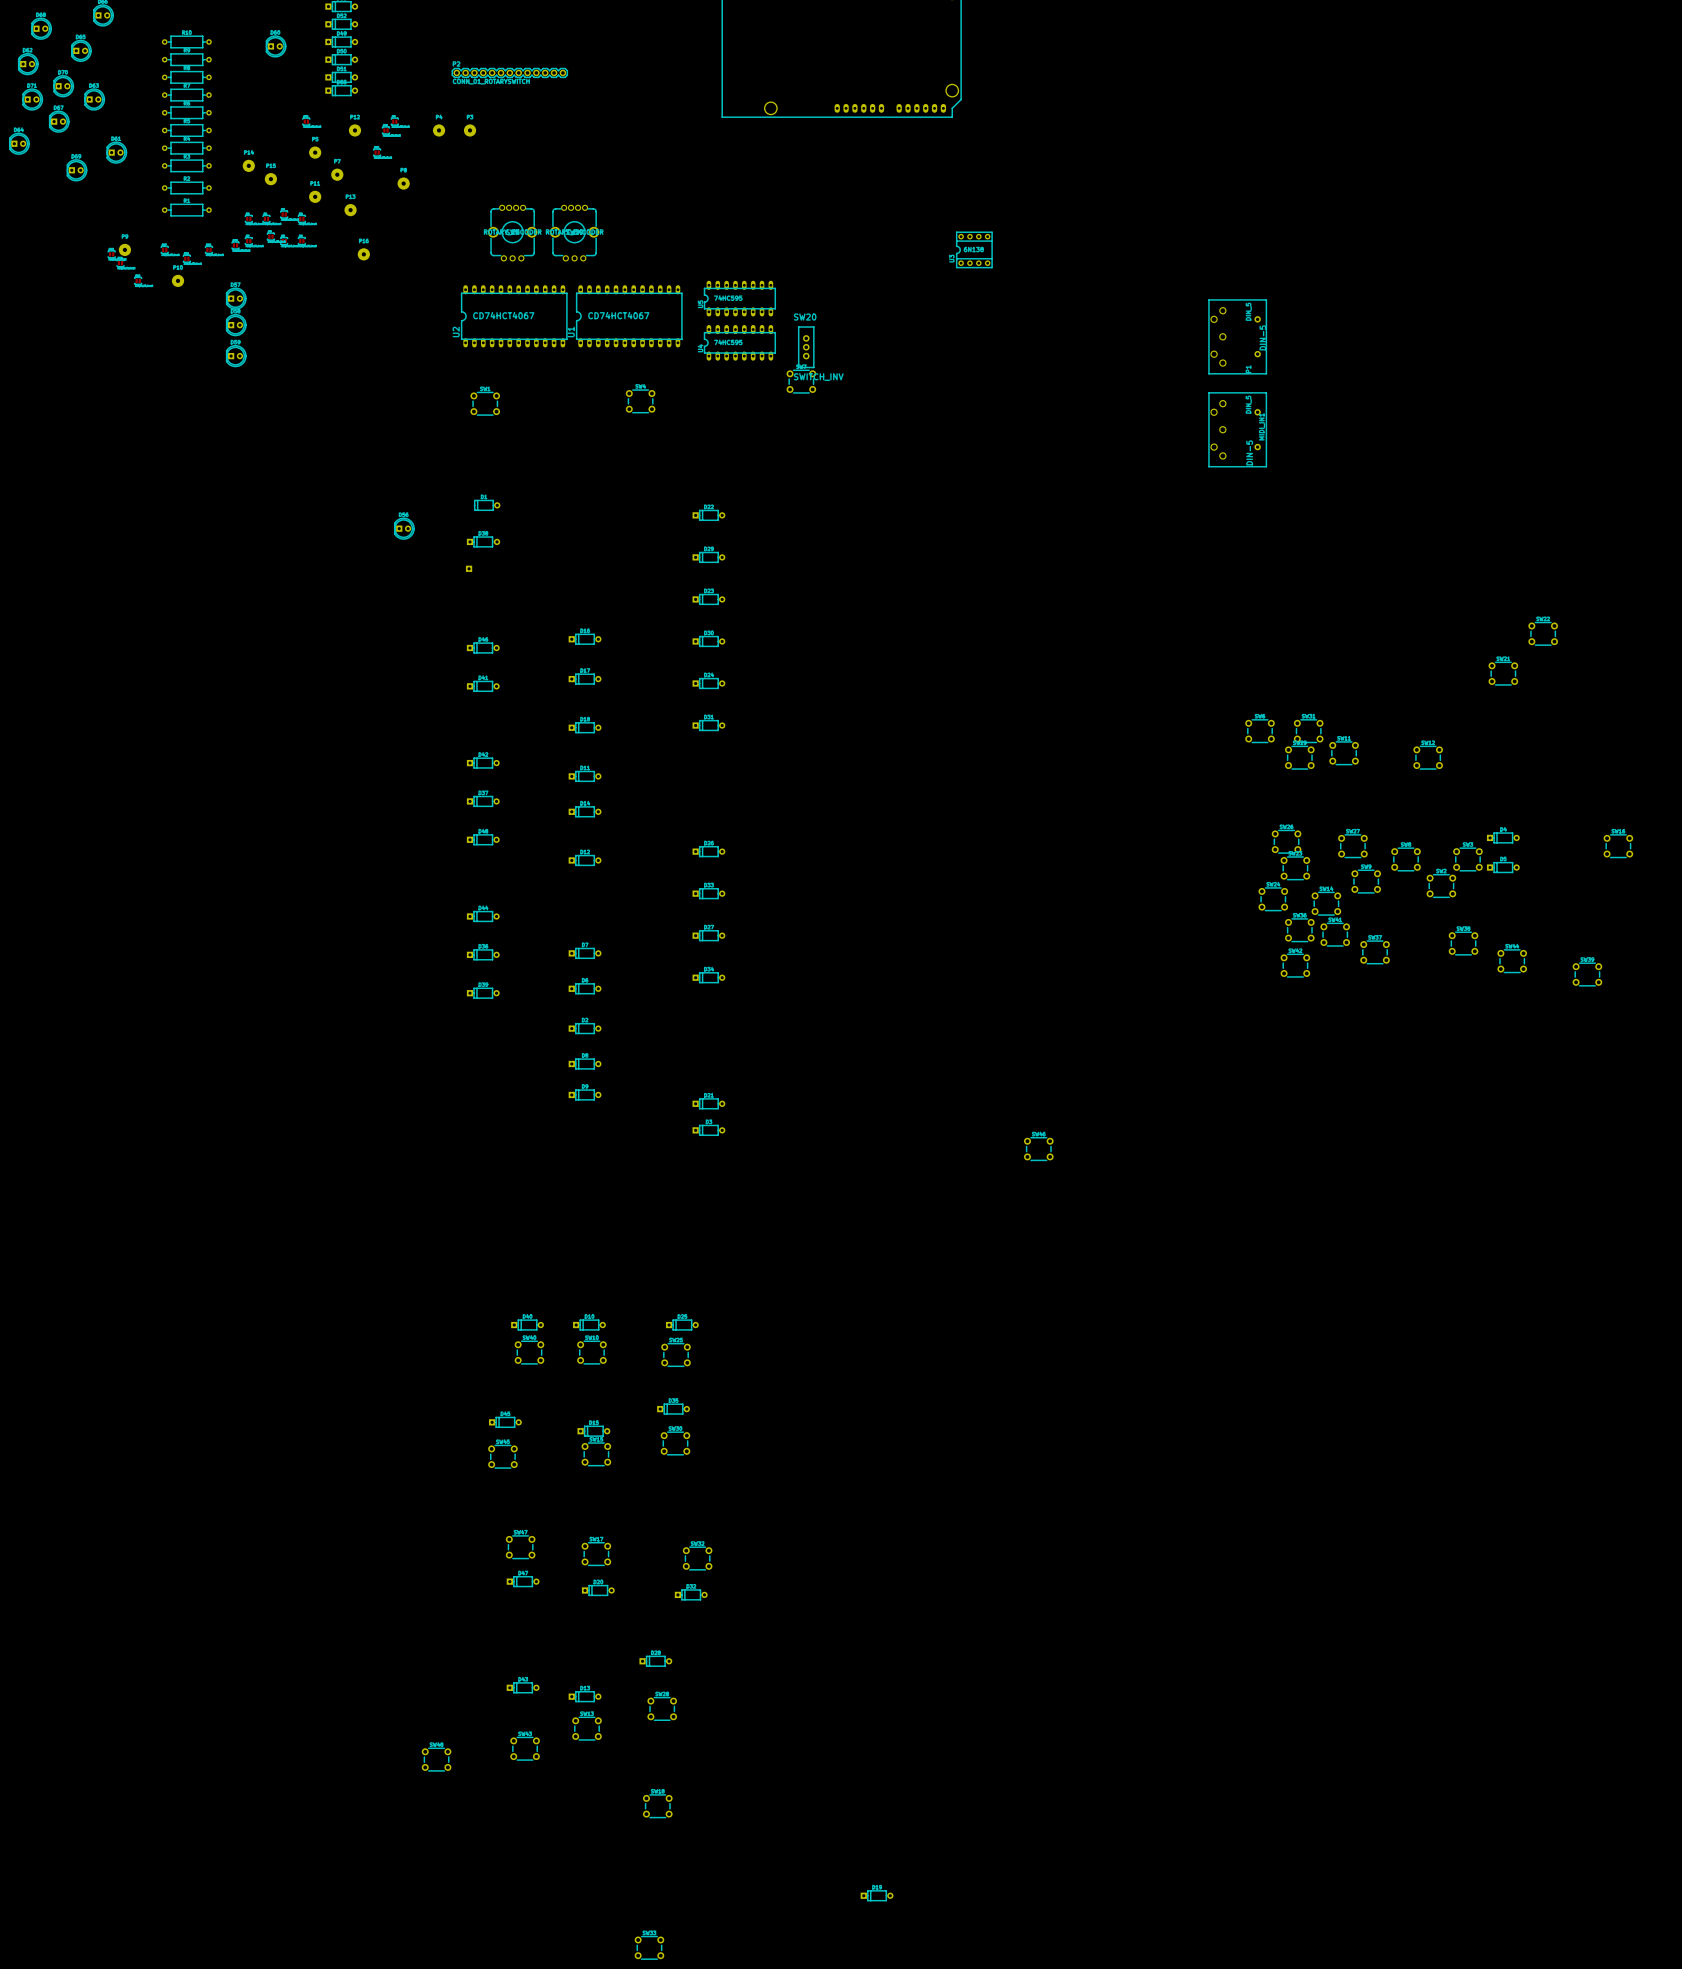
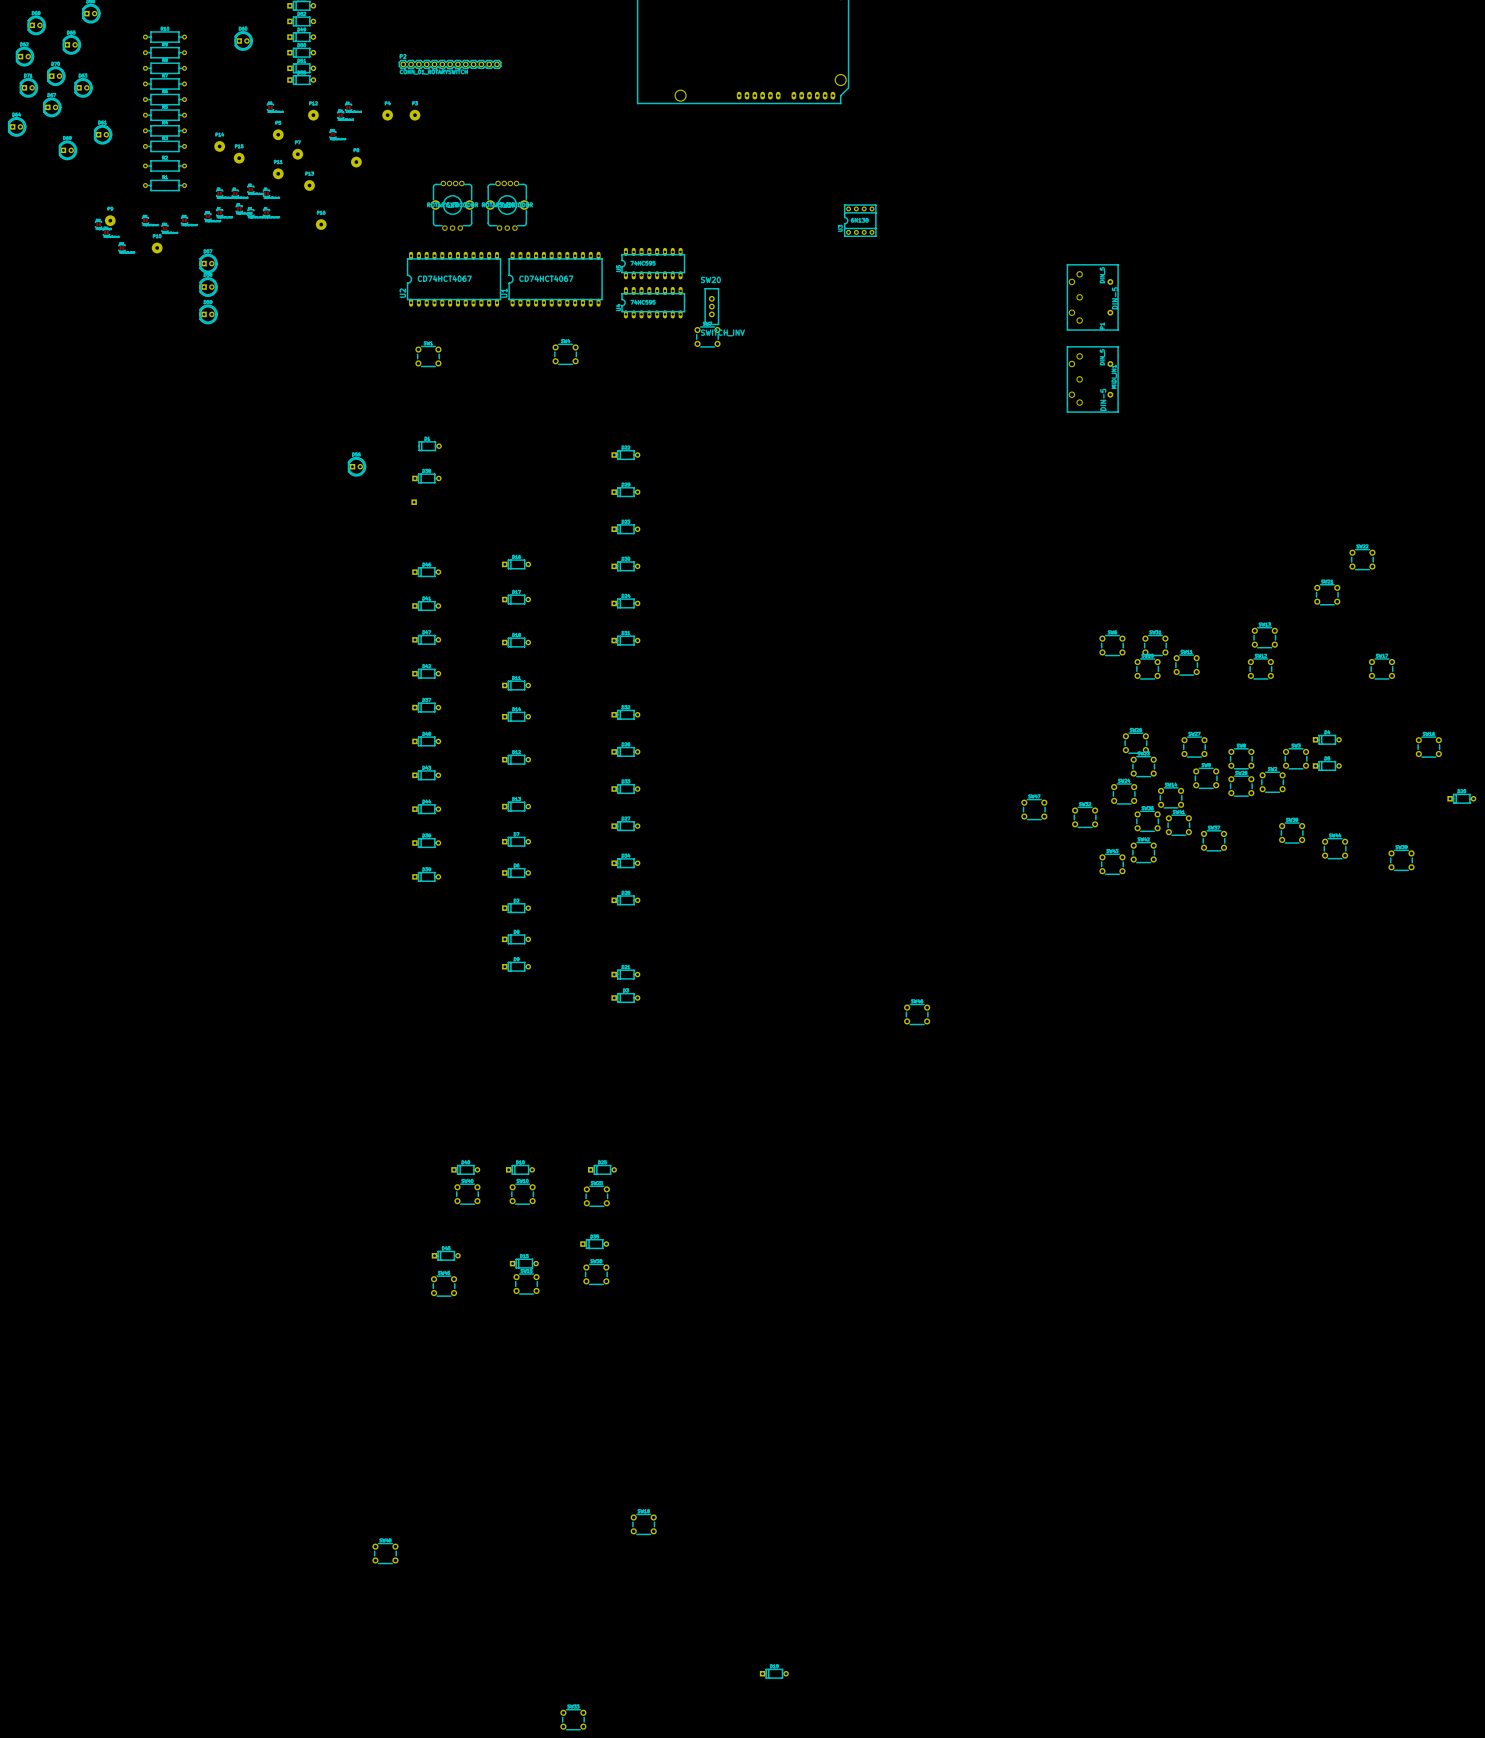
part position: (520, 1547) -> (1034, 809)
part position: (596, 1554) -> (1381, 668)
part position: (697, 1558) -> (1085, 817)
part position: (523, 1581) -> (426, 639)
part position: (598, 1590) -> (1461, 798)
part position: (691, 1594) -> (625, 714)
part position: (655, 1661) -> (625, 900)
part position: (523, 1687) -> (426, 775)
part position: (585, 1696) -> (516, 806)
part position: (662, 1708) -> (1241, 786)
part position: (587, 1728) -> (1264, 637)
part position: (525, 1748) -> (1112, 864)
part position: (657, 1806) -> (643, 1524)

